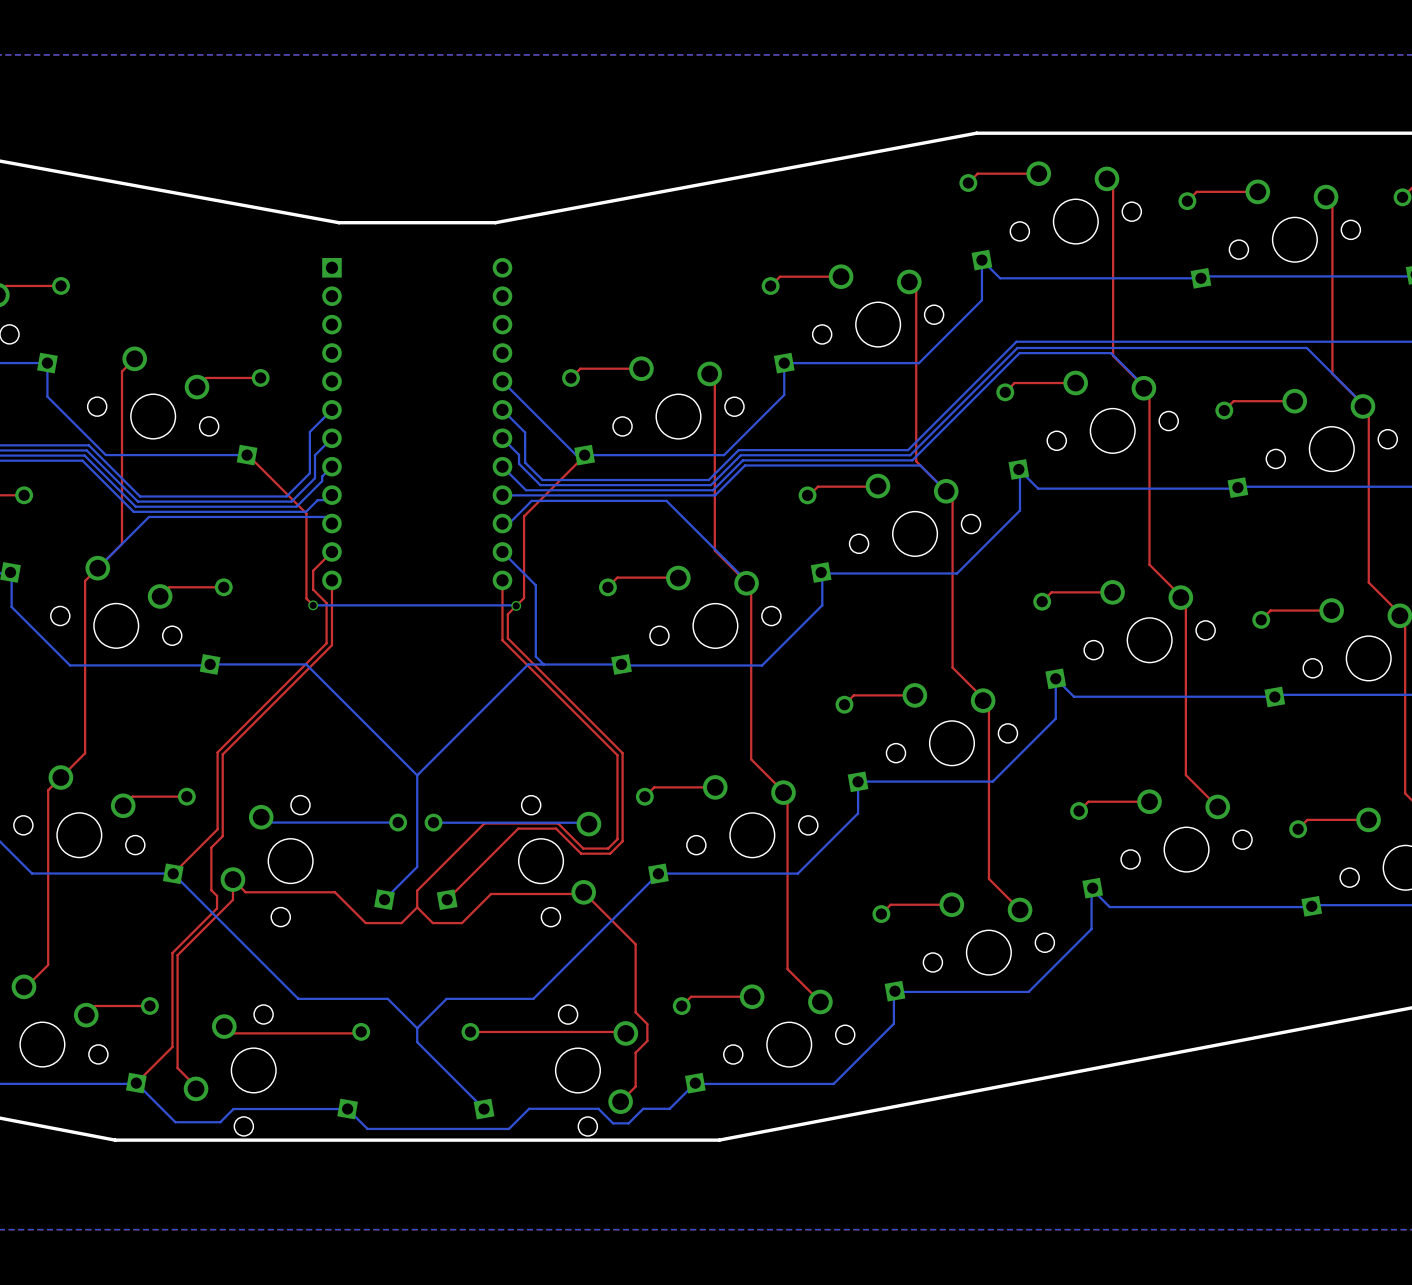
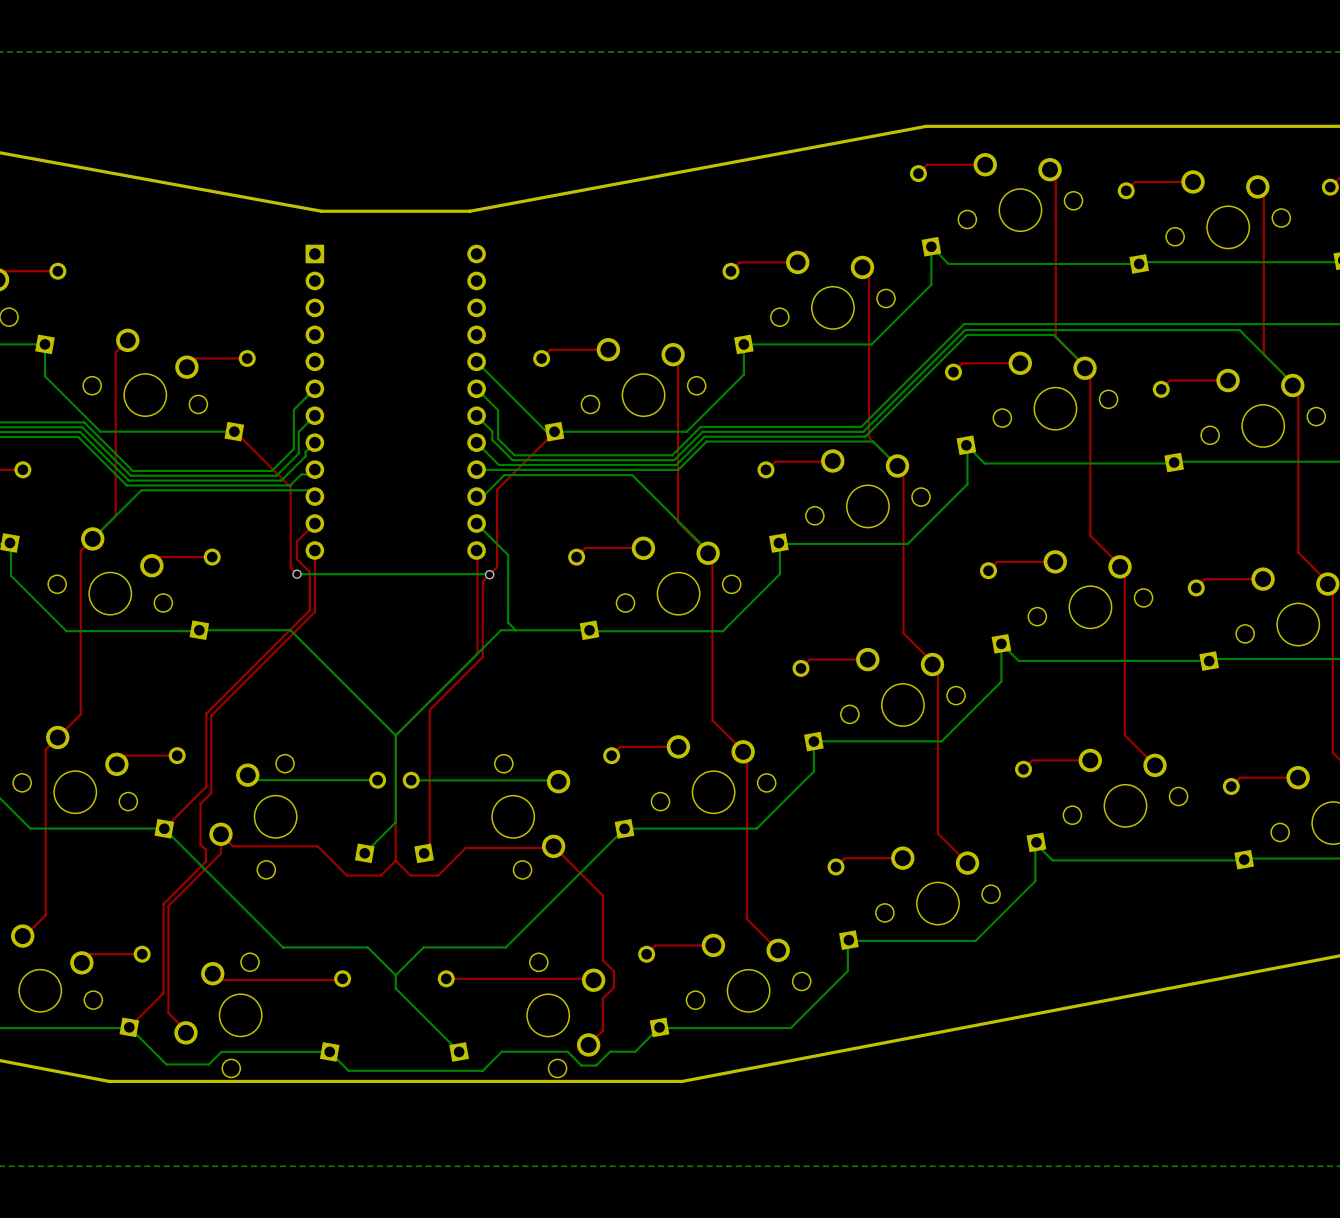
top track: (502, 580) (502, 640) (617, 755) (617, 839) (608, 848) (583, 848) (558, 823) (484, 823) (417, 890) -> (477, 551) (477, 653) (395, 735) (395, 844)
top track: (508, 613) (507, 638) (622, 753) (622, 841) (610, 853) (581, 853) (556, 828) (518, 828) (453, 893) -> (482, 581) (482, 656) (429, 710) (429, 847)

